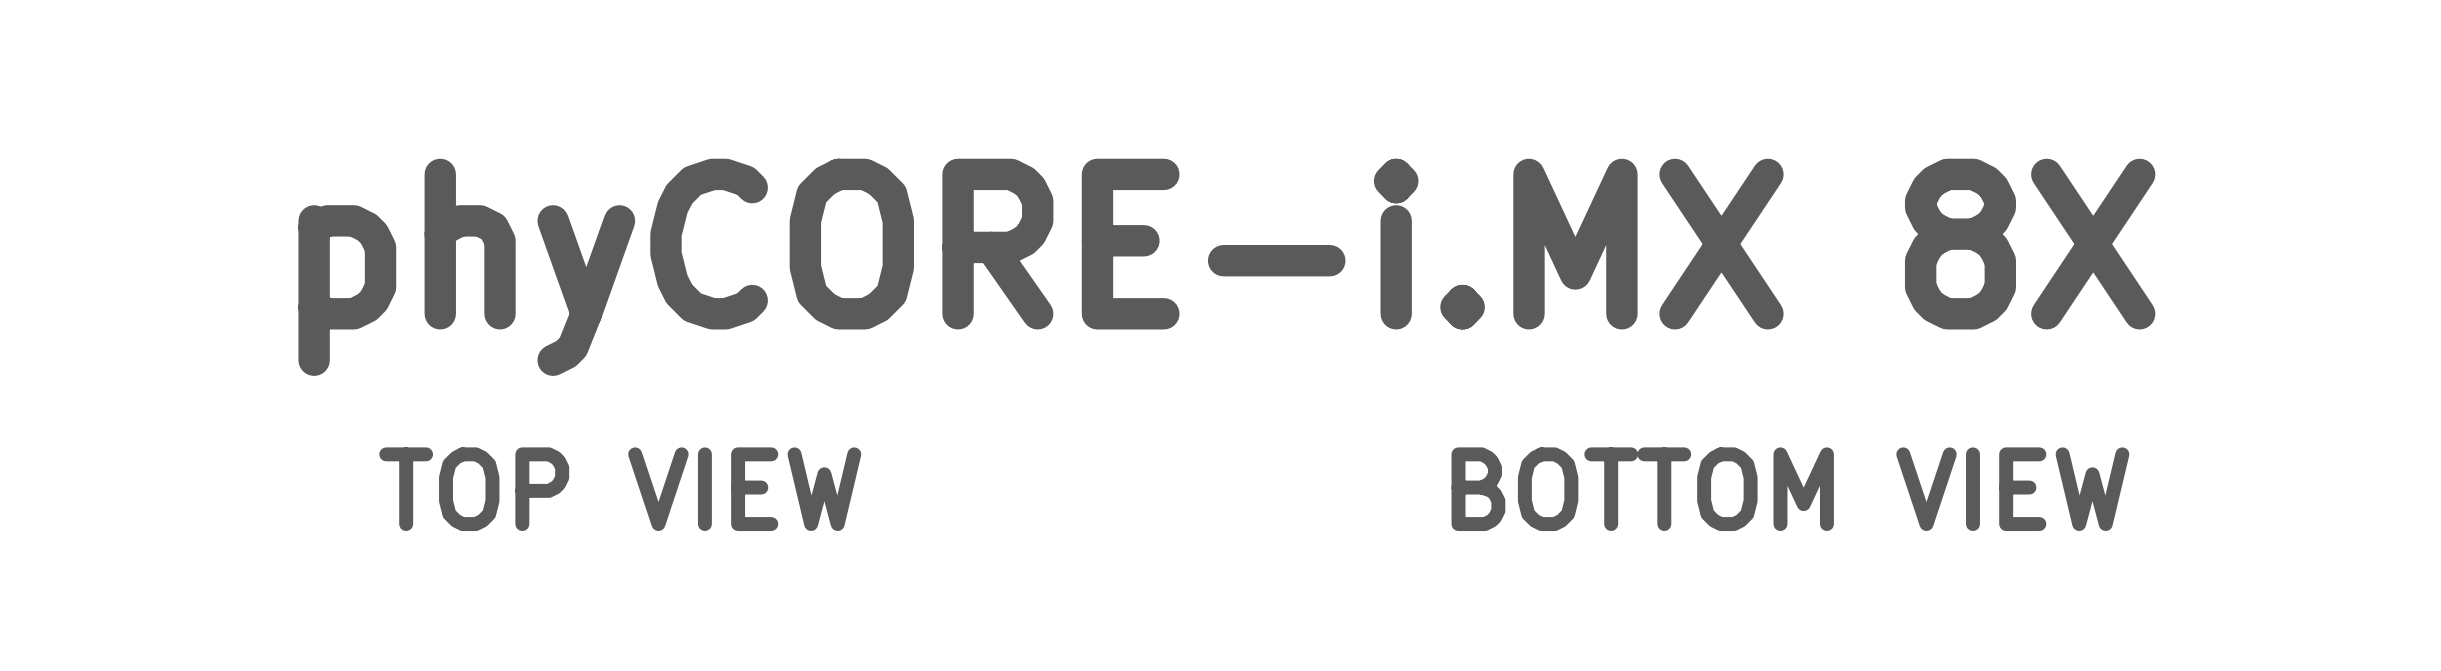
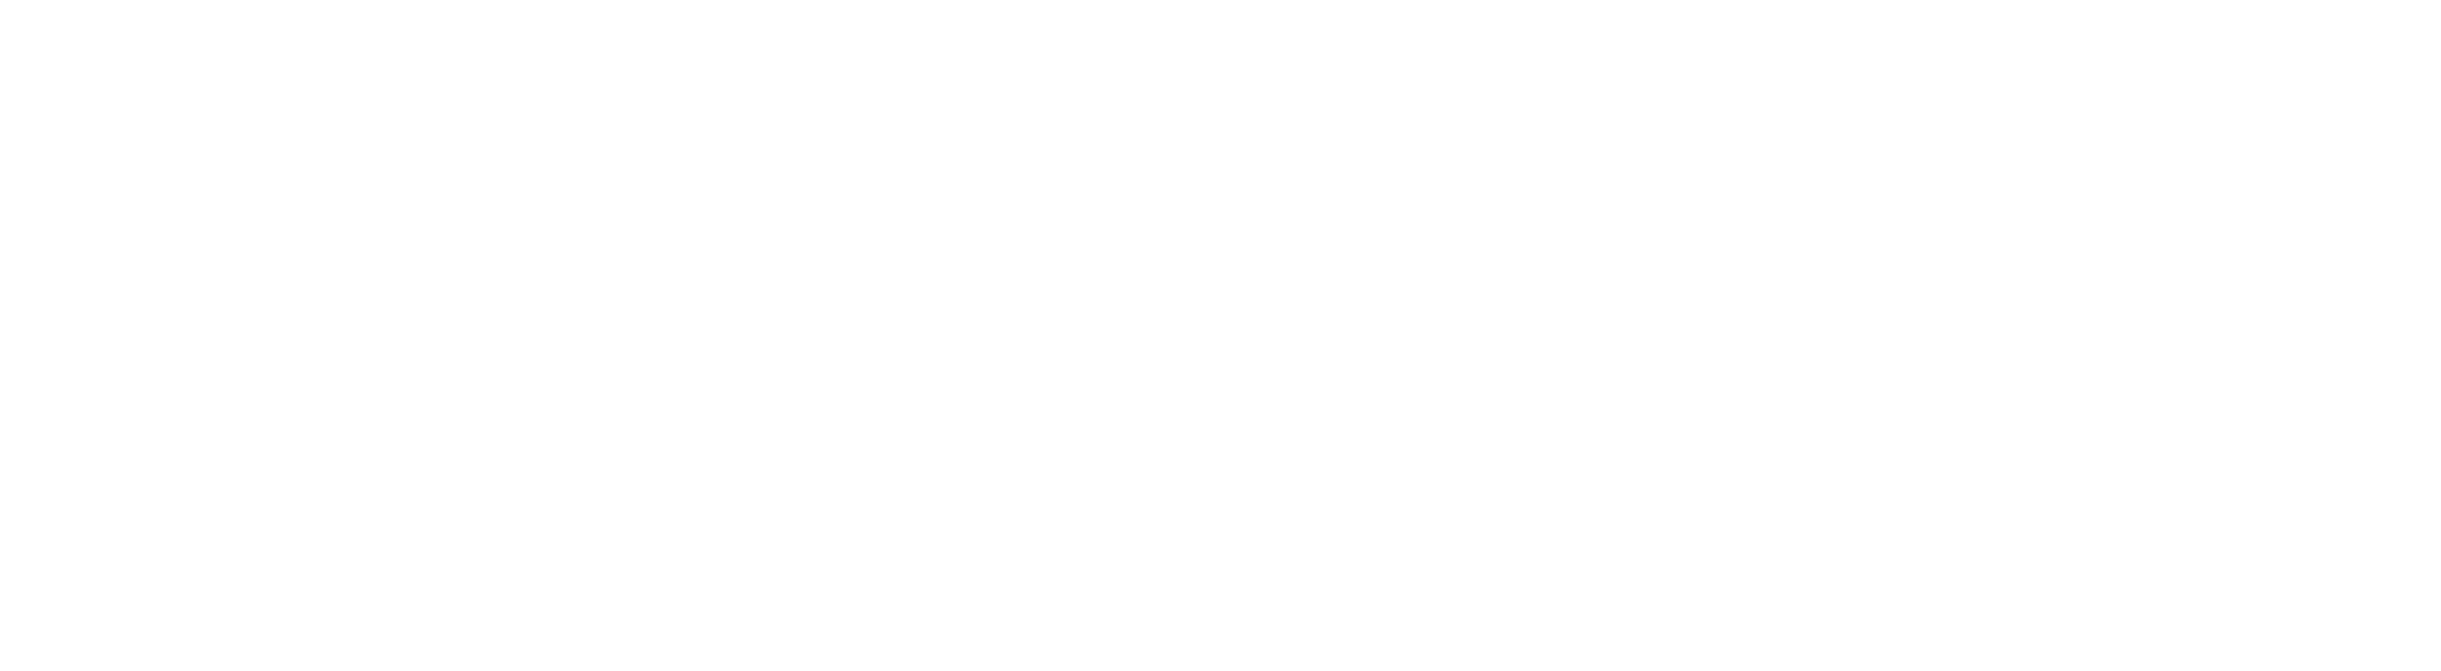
text: phyCORE-i.MX 8X (1226, 267) -> none
text: TOP VIEW (620, 489) -> none
text: BOTTOM VIEW (1790, 489) -> none

